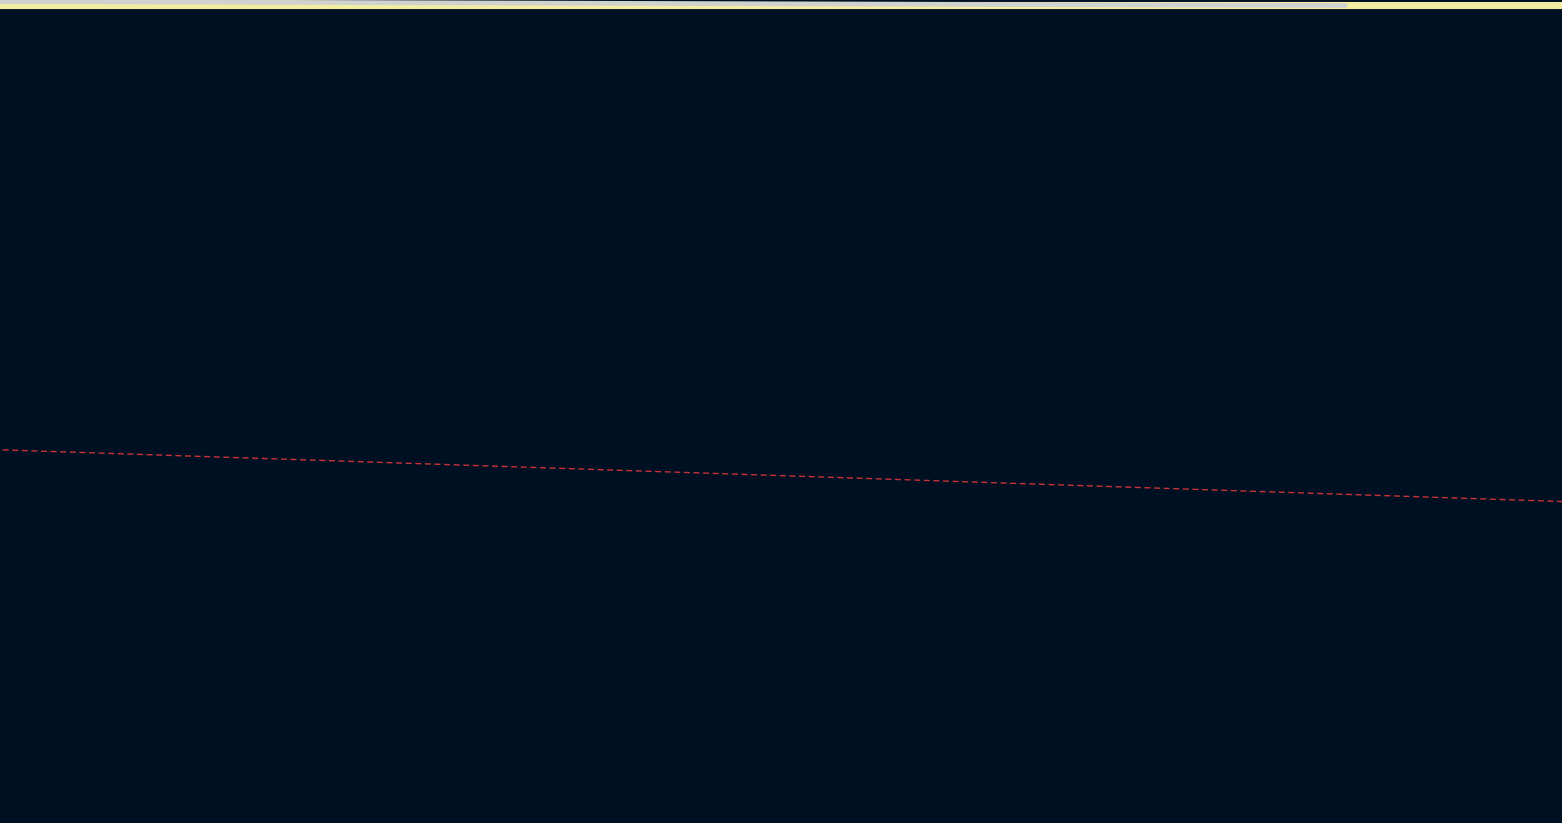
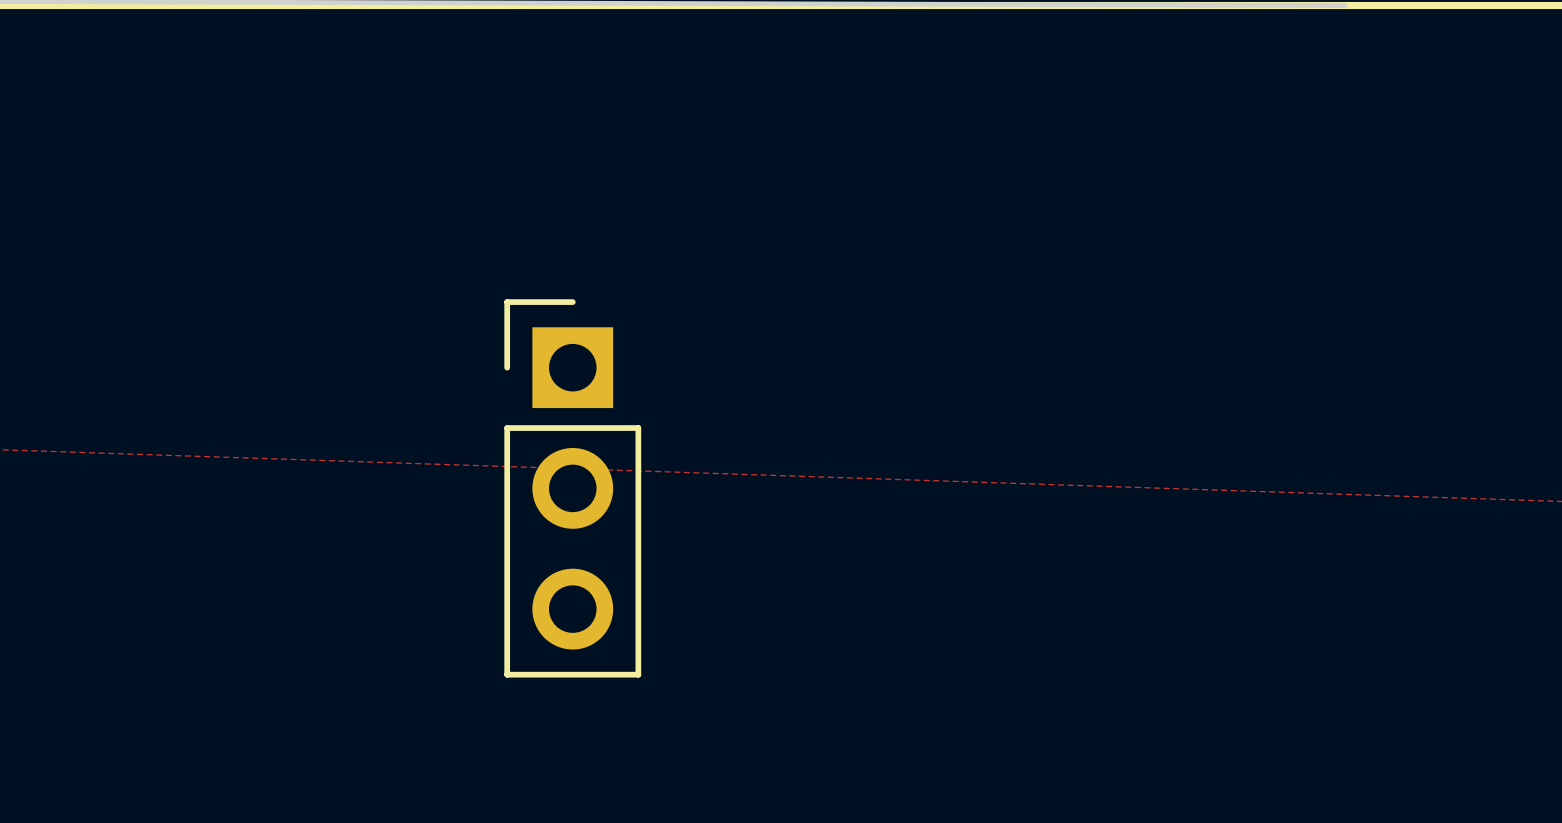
part: none -> (572, 488)

